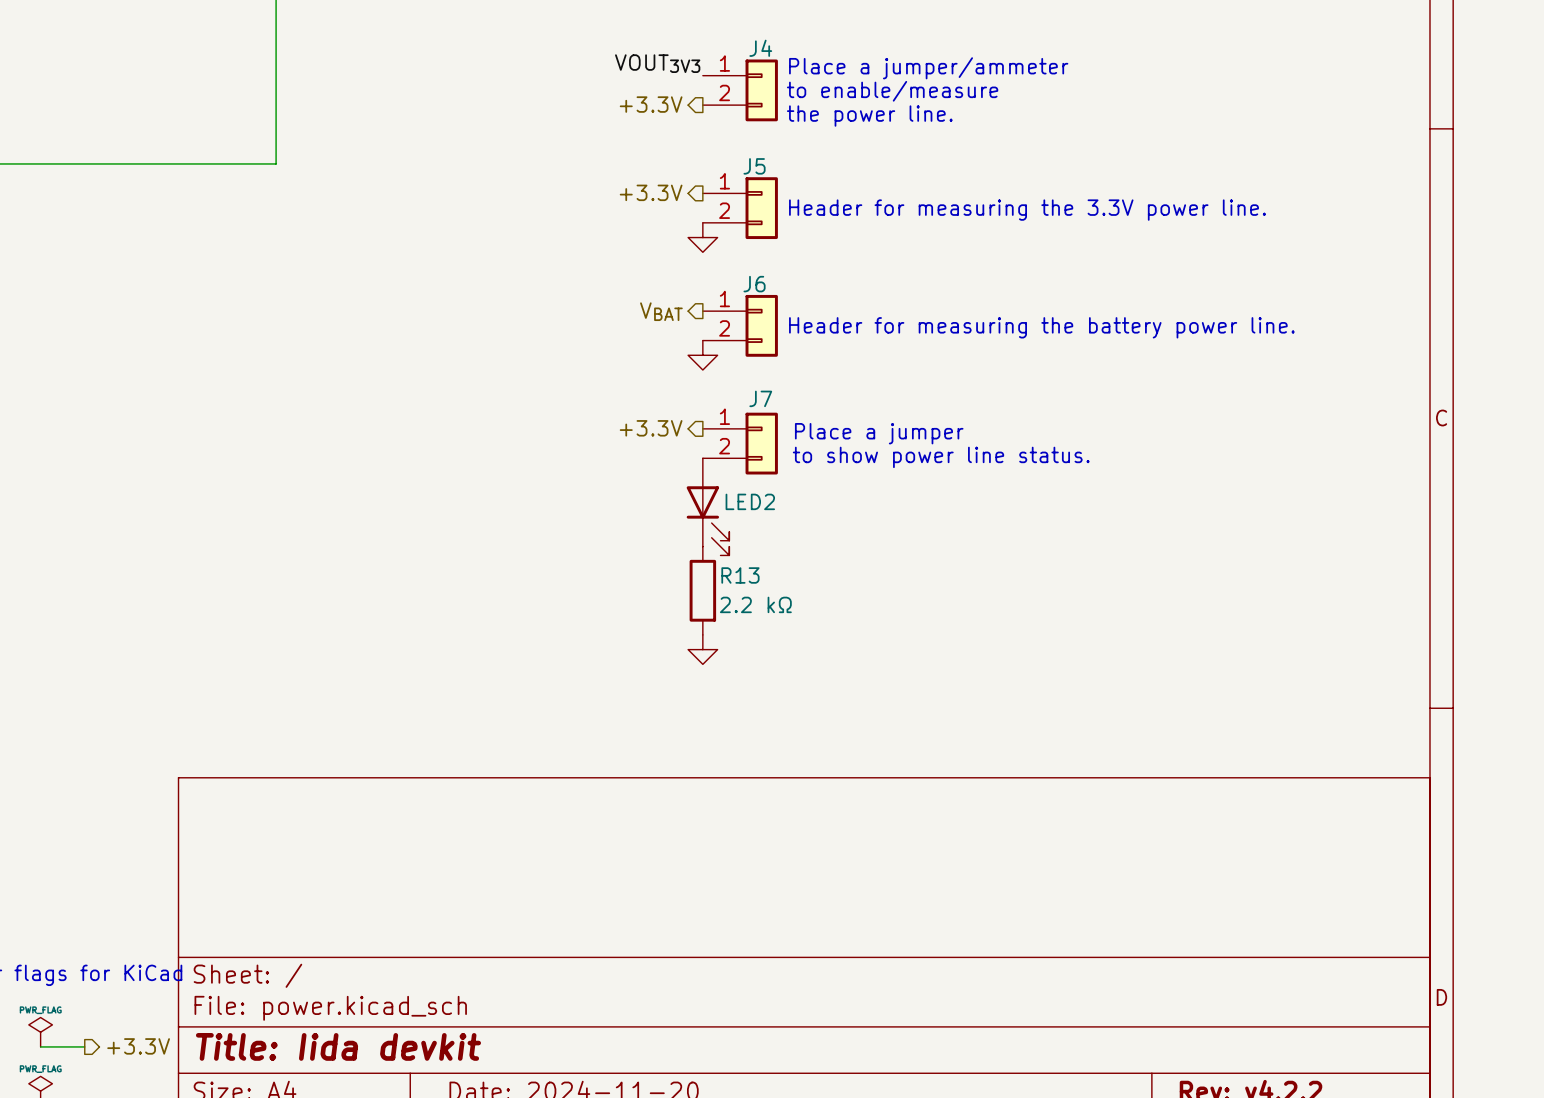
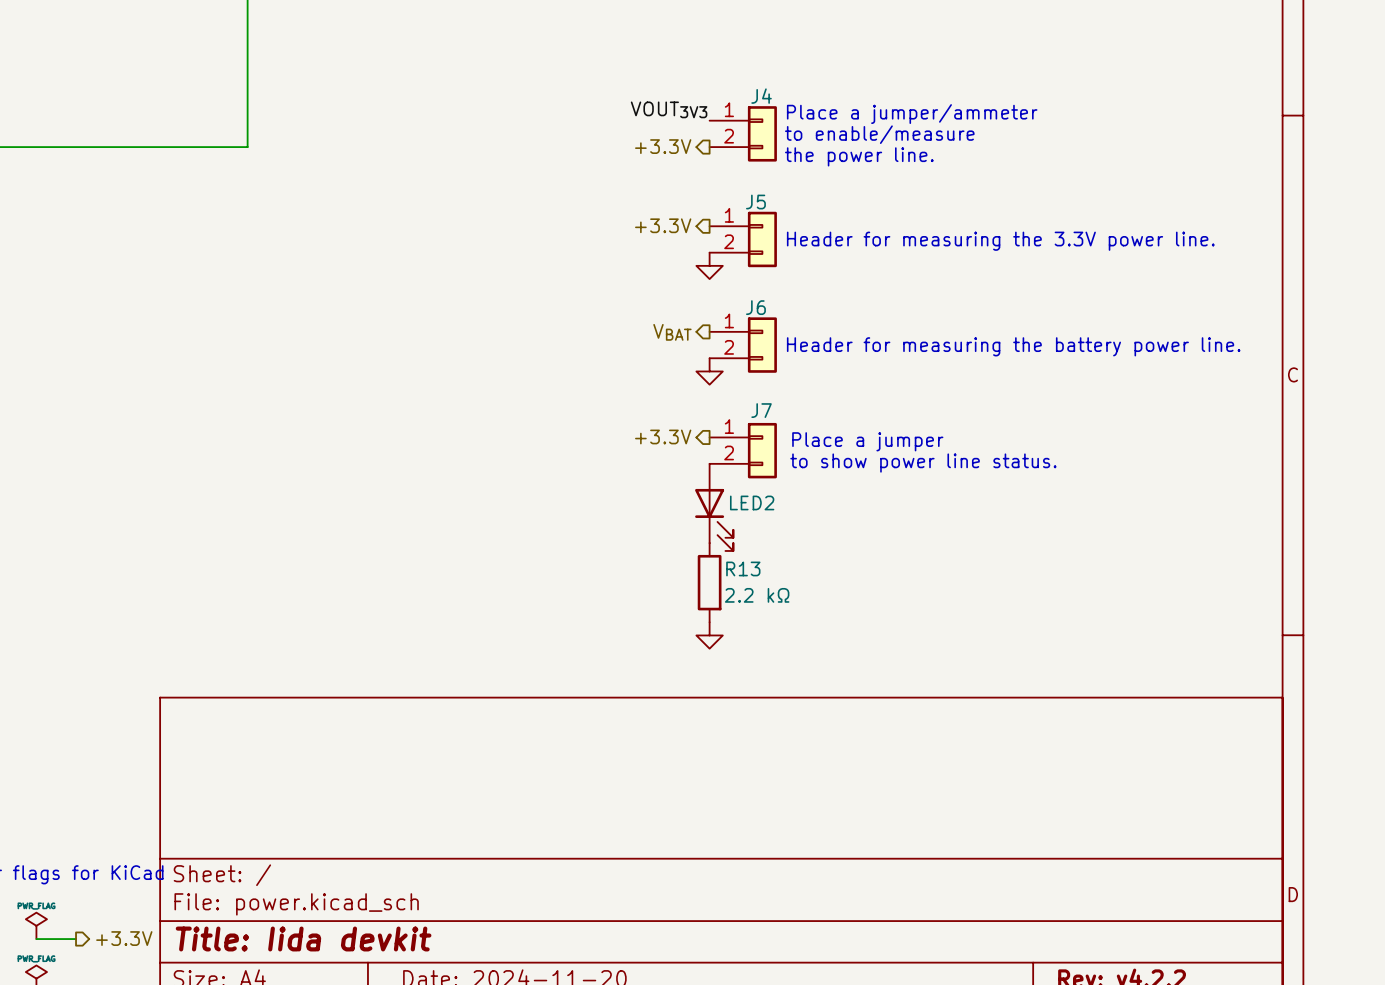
label position: VOUT3V3 (657, 63) -> VOUT3V3 (669, 109)
text position: Place a jumper/ammeter (928, 68) -> Place a jumper/ammeter (912, 114)
J4 position: (740, 90) -> (743, 133)
text position: to enable/measure (892, 91) -> to enable/measure (879, 134)
hierarchical label: +3.3V (651, 104) -> none
text position: the power line. (869, 116) -> the power line. (859, 156)
hierarchical label: none -> +3.3V (663, 146)
hierarchical label: +3.3V (651, 192) -> none
J5 position: (740, 208) -> (743, 239)
text position: Header for measuring the 3.3V power line. (1027, 210) -> Header for measuring the 3.3V power line. (1000, 241)
power symbol: (702, 237) -> none
hierarchical label: none -> +3.3V (663, 225)
power symbol: none -> (709, 265)
hierarchical label position: VBAT (661, 311) -> VBAT (672, 332)
J6 position: (740, 325) -> (743, 345)
text position: Header for measuring the battery power line. (1041, 327) -> Header for measuring the battery power line. (1013, 346)
power symbol: (702, 355) -> none
power symbol: none -> (709, 371)
hierarchical label: +3.3V (651, 428) -> none
text position: Place a jumper (879, 433) -> Place a jumper (867, 441)
J7 position: (740, 443) -> (743, 450)
text position: to show power line status. (941, 457) -> to show power line status. (923, 463)
hierarchical label: none -> +3.3V (663, 436)
LED2 position: (708, 506) -> (714, 507)
R13 position: (702, 590) -> (709, 582)
power symbol position: (702, 649) -> (709, 635)

